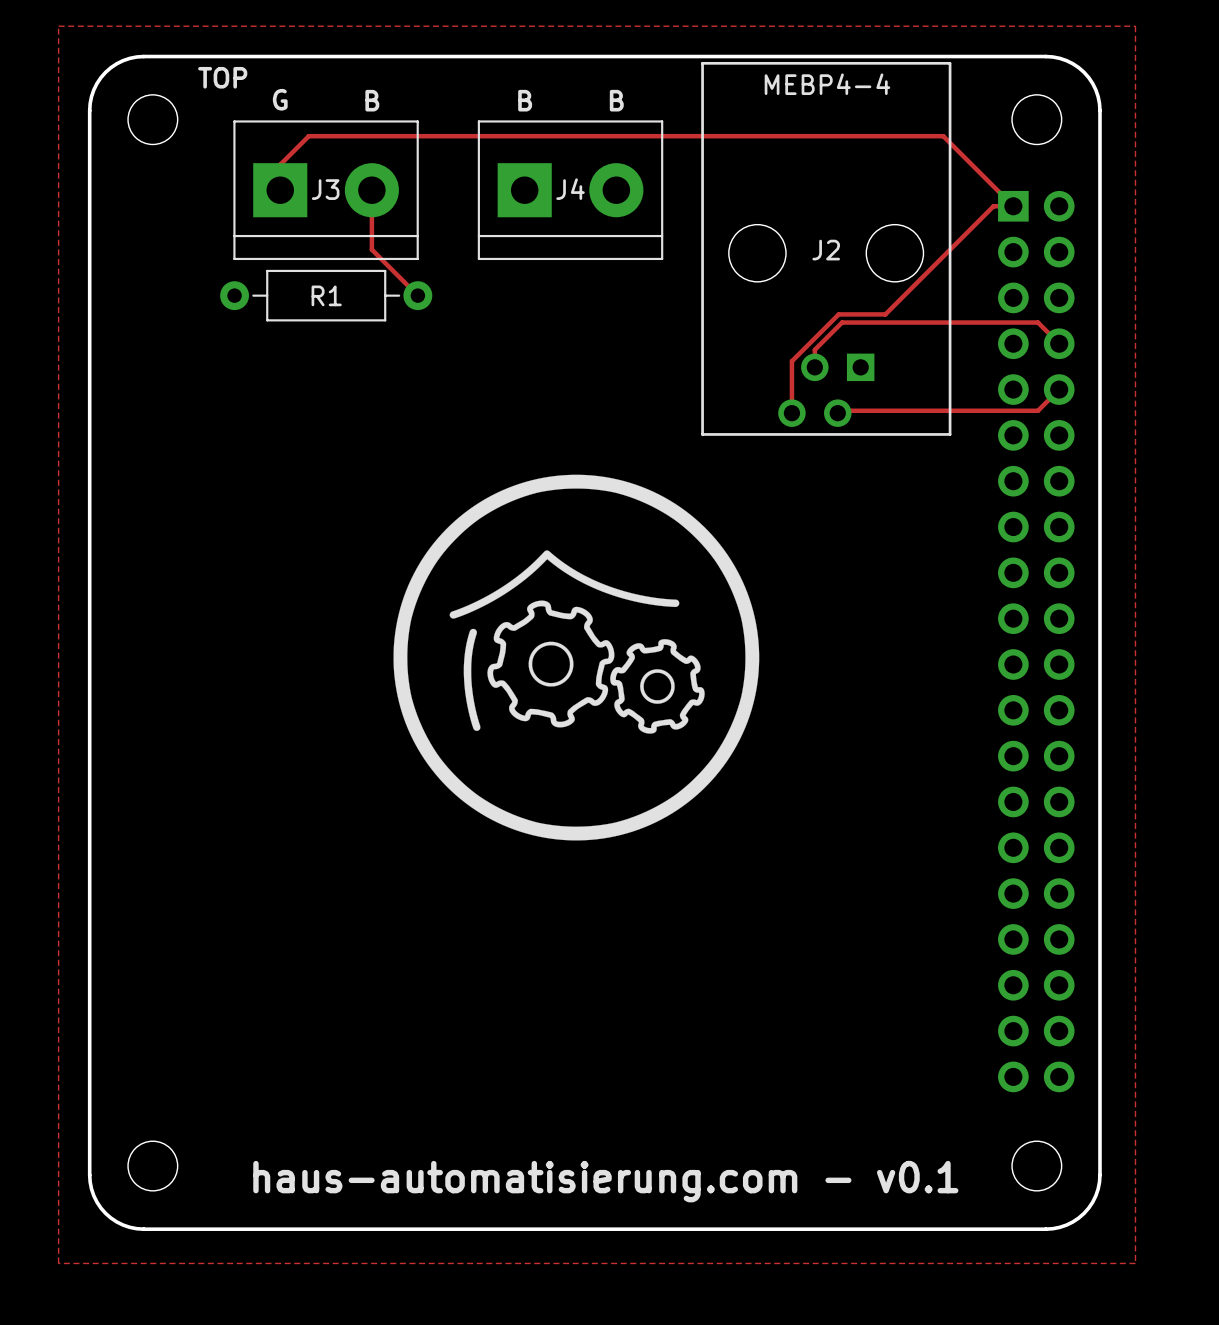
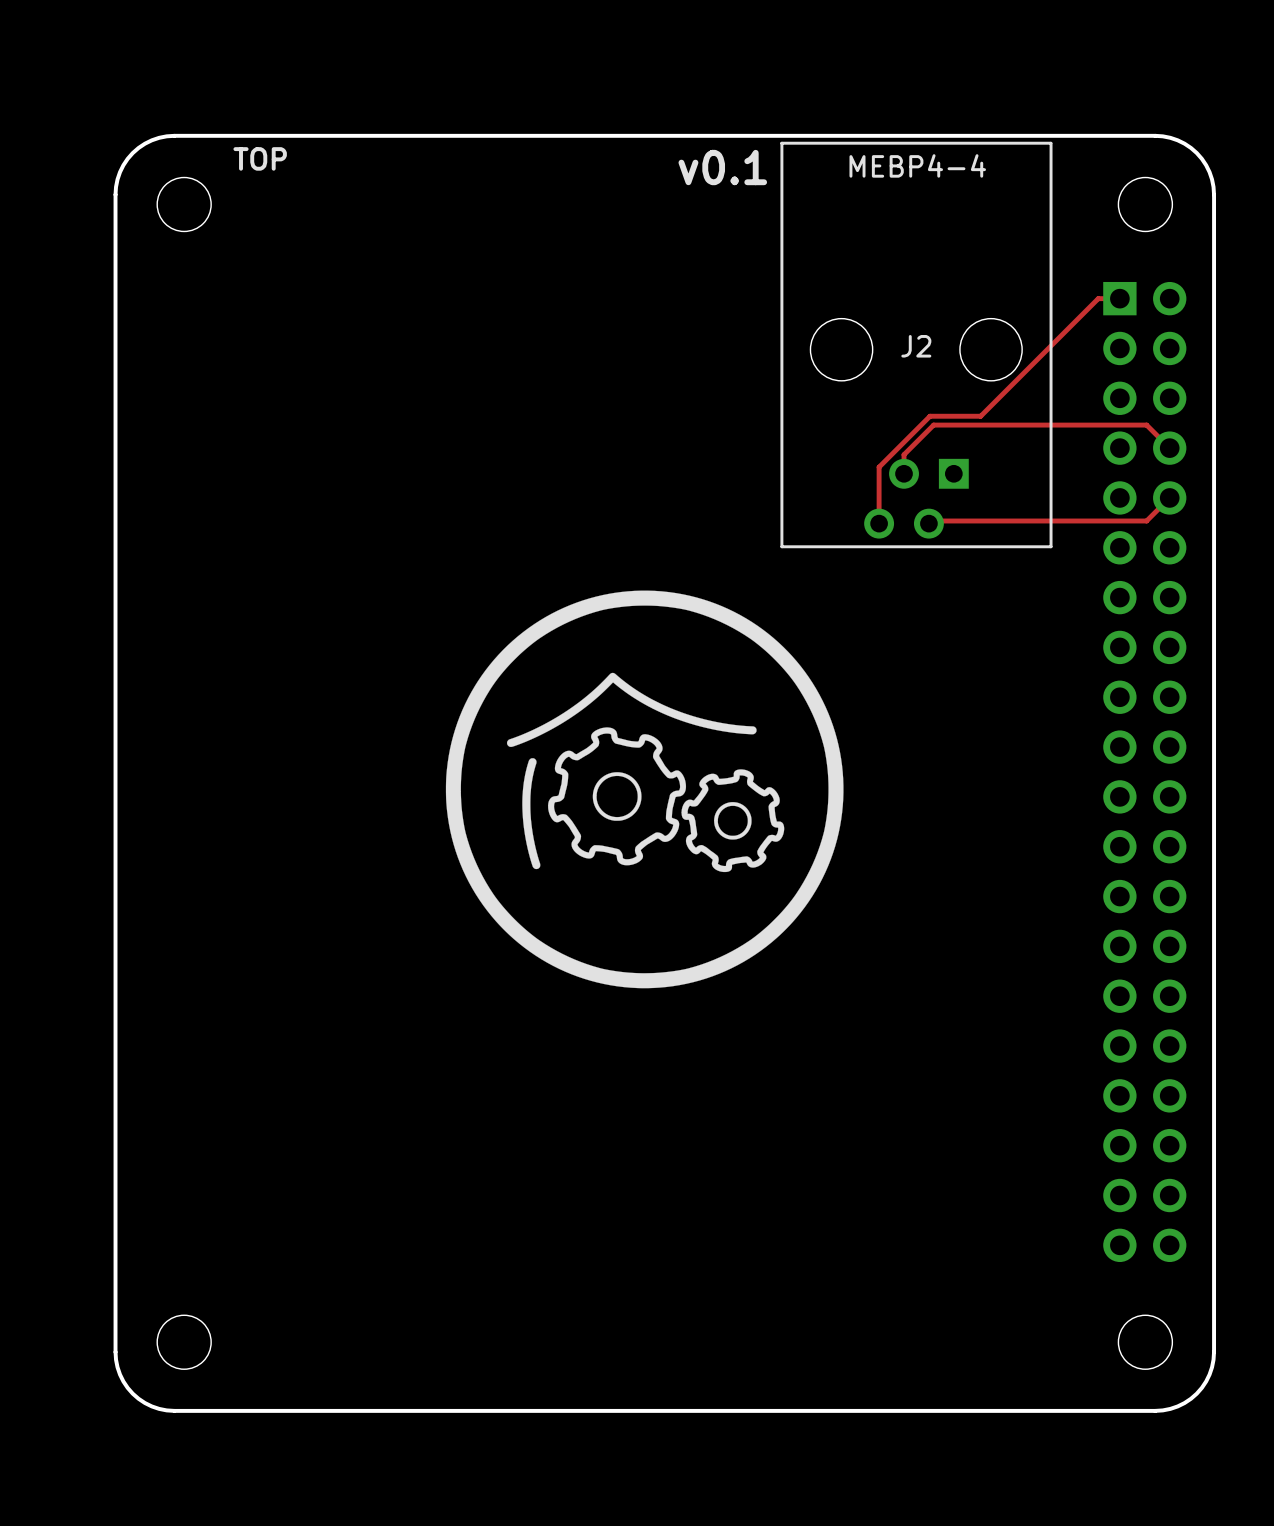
zone outline: (58, 26) (58, 1263) (1135, 1263) (1135, 26) (58, 26) -> none
text: none -> v0.1 (722, 167)
text: G (280, 99) -> none
text: B (372, 100) -> none
text: B (525, 100) -> none
text: B (616, 100) -> none
track: (280, 190) (280, 164) (308, 136) (943, 136) (1013, 206) -> none
J3: (326, 190) -> none
track: (371, 190) (371, 249) (417, 295) -> none
J4: (570, 190) -> none
R1: (326, 295) -> none
text: haus-automatisierung.com - v0.1 (605, 1181) -> none

